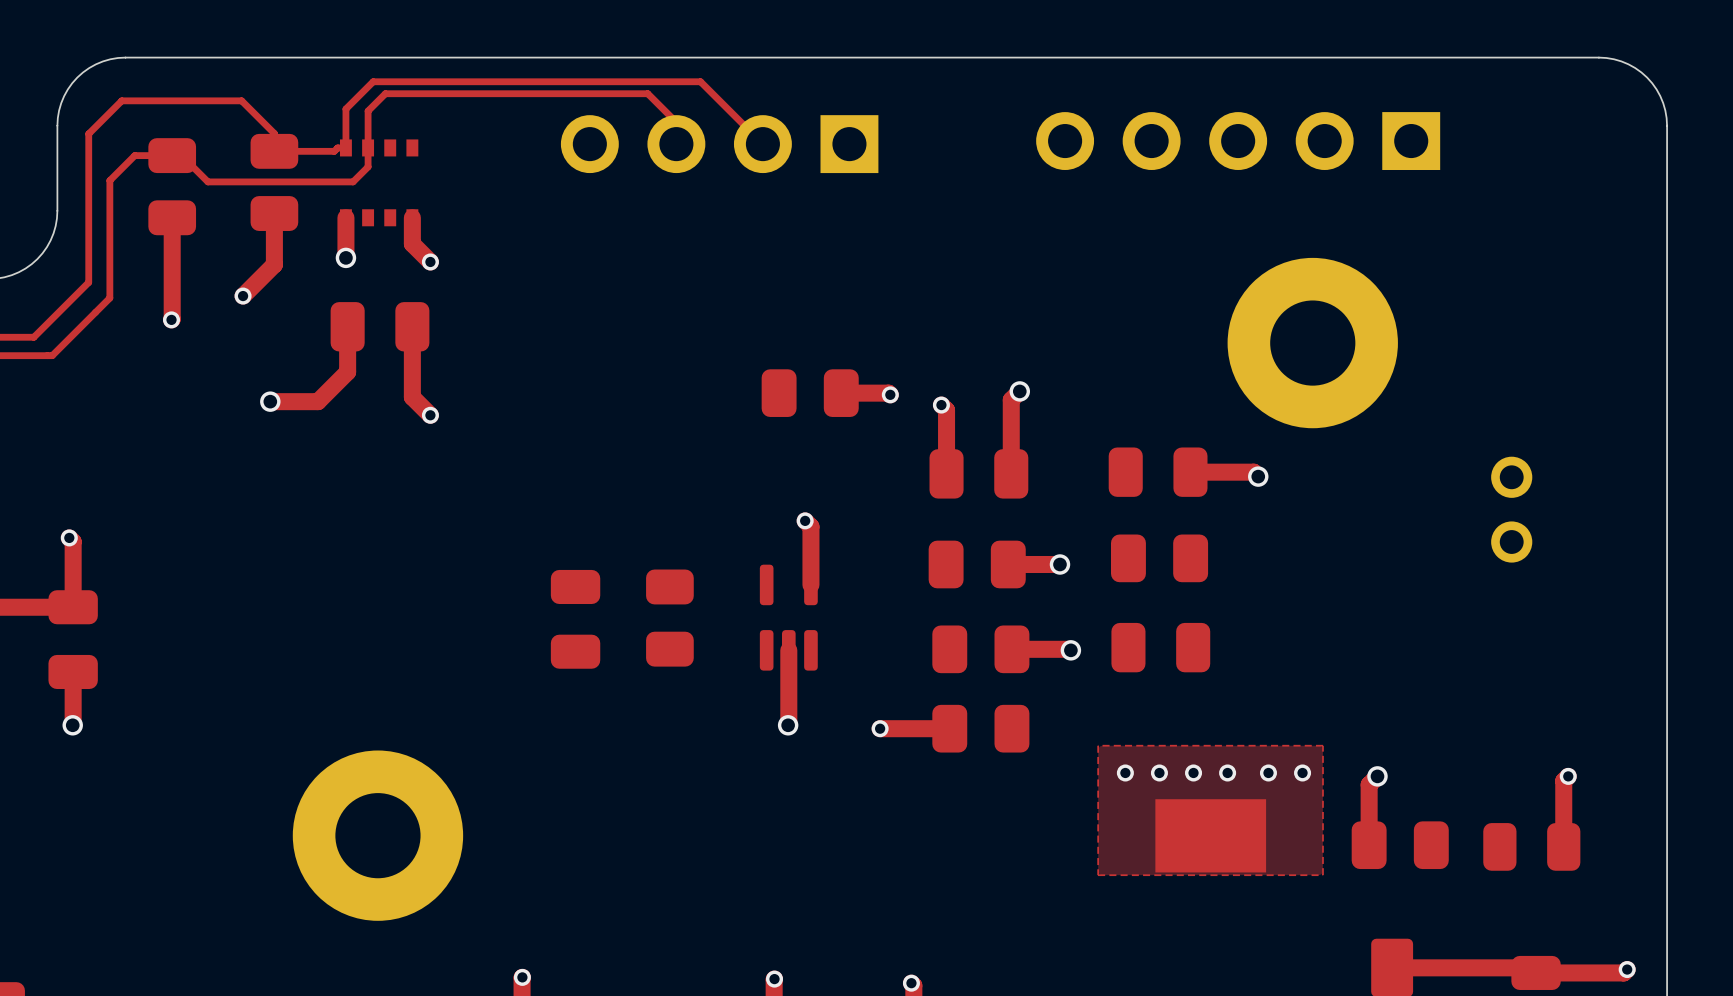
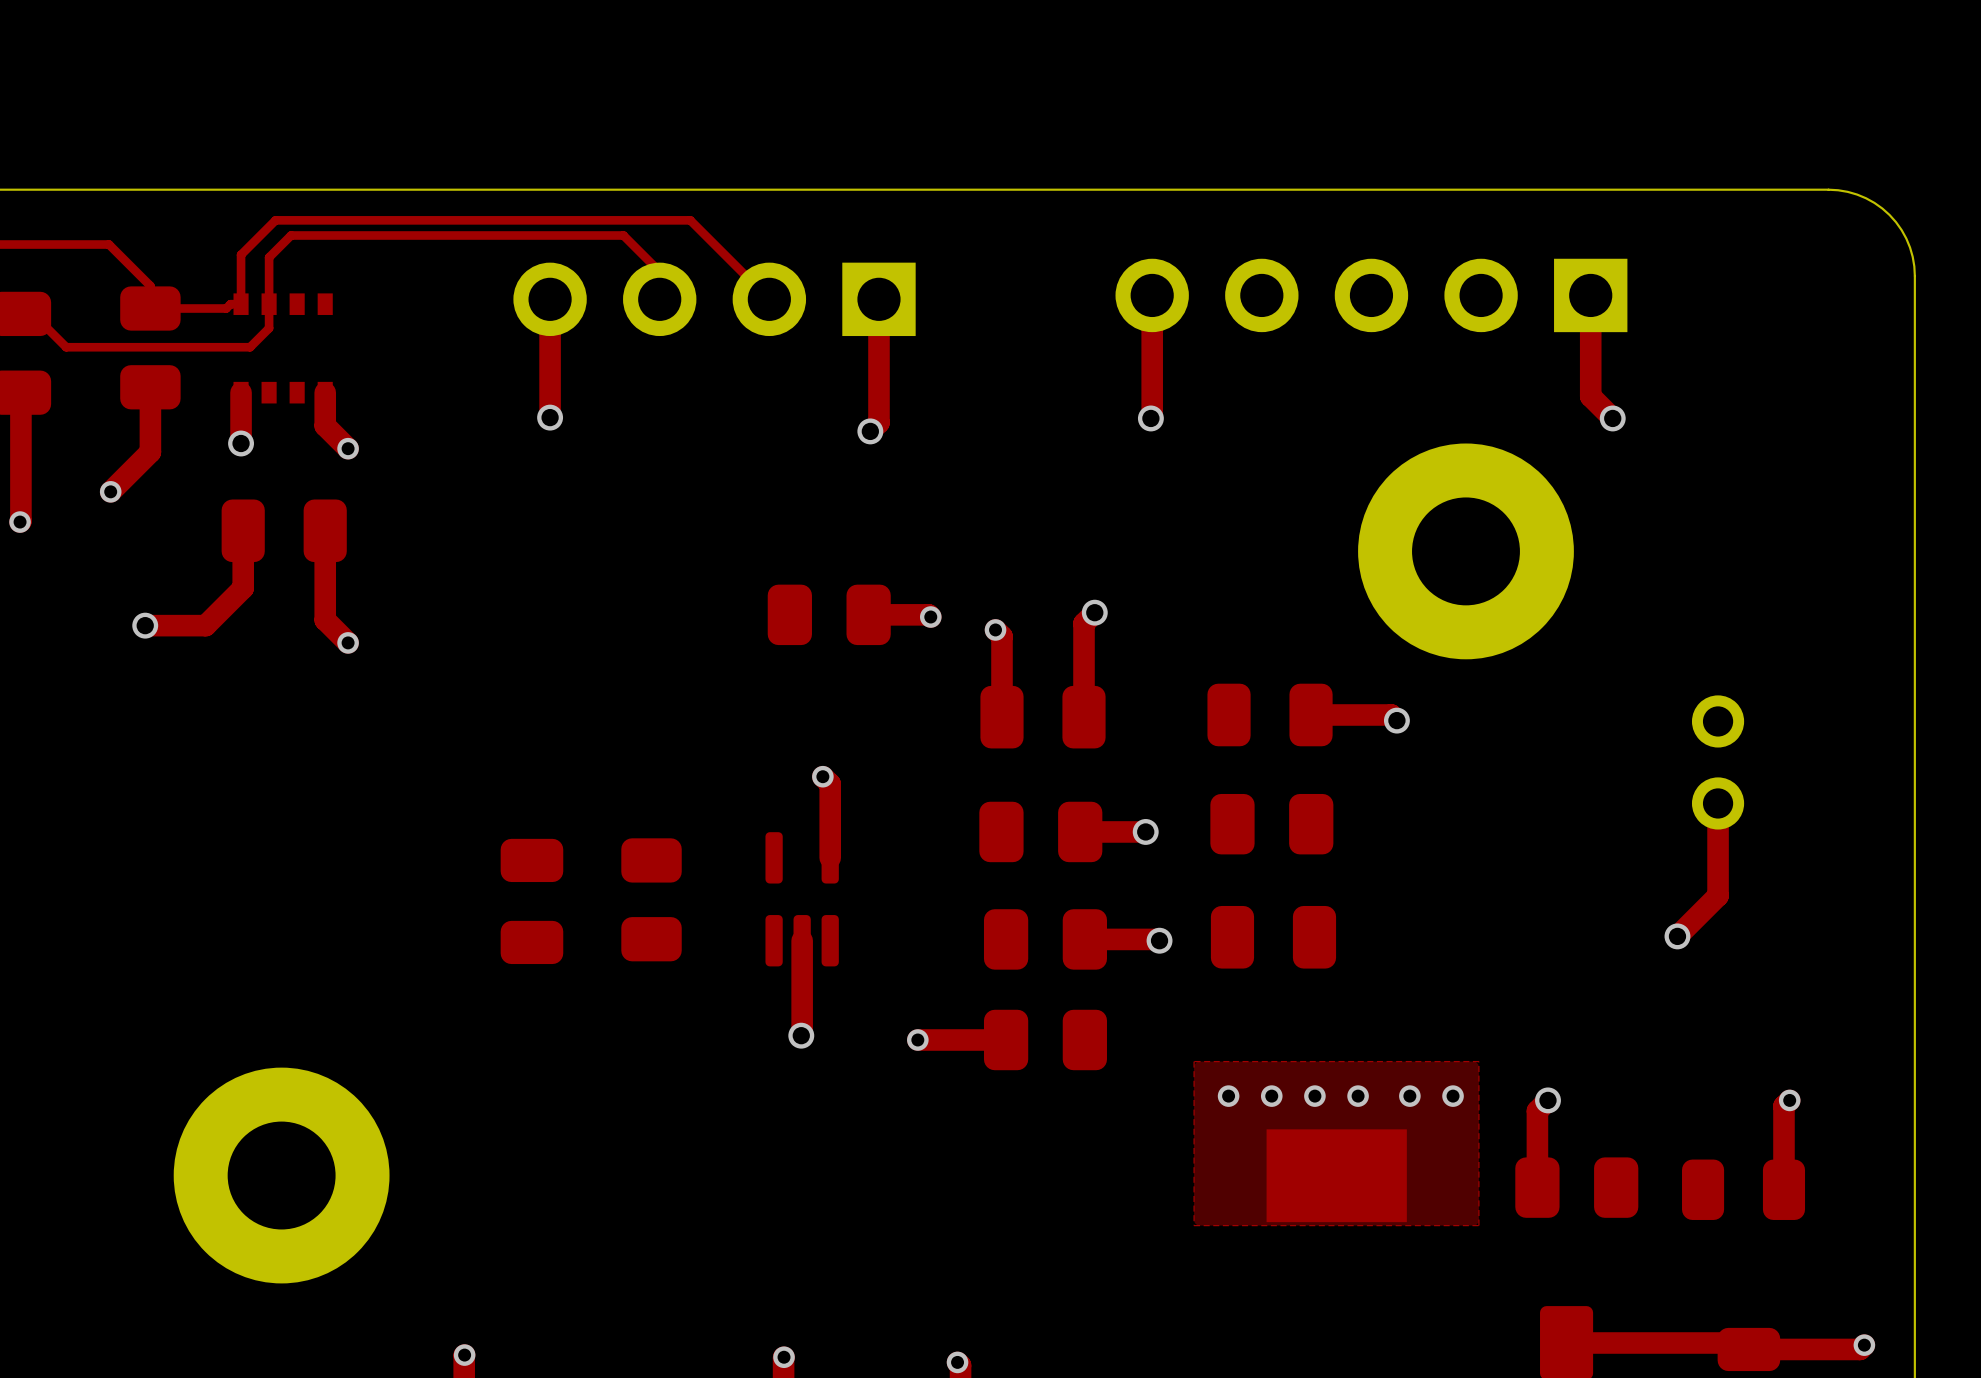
top track: none -> (1152, 295) (1150, 418)
top track: none -> (1590, 295) (1590, 396) (1612, 418)
top track: none -> (550, 299) (550, 418)
top track: none -> (878, 299) (878, 422) (870, 431)
via: none -> (550, 417)
via: none -> (1150, 418)
via: none -> (1612, 418)
via: none -> (870, 431)
top track: none -> (1718, 803) (1718, 895) (1677, 936)
via: none -> (1677, 936)

